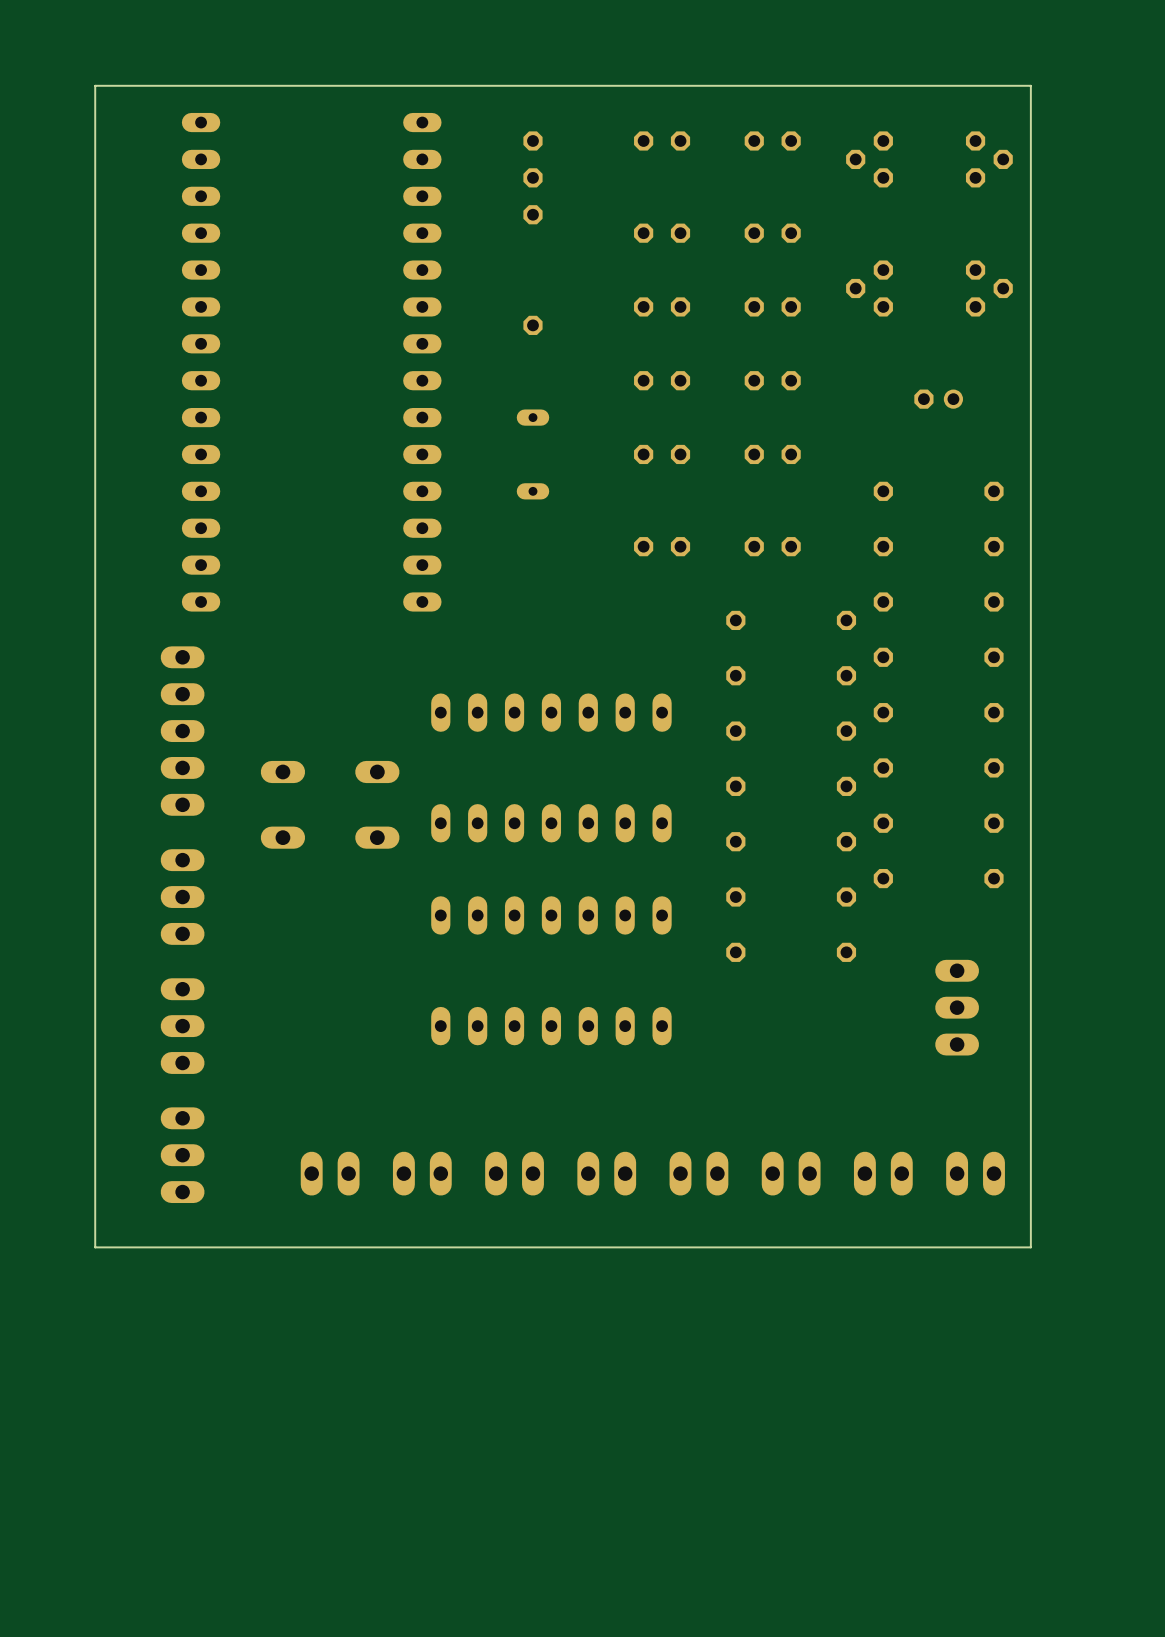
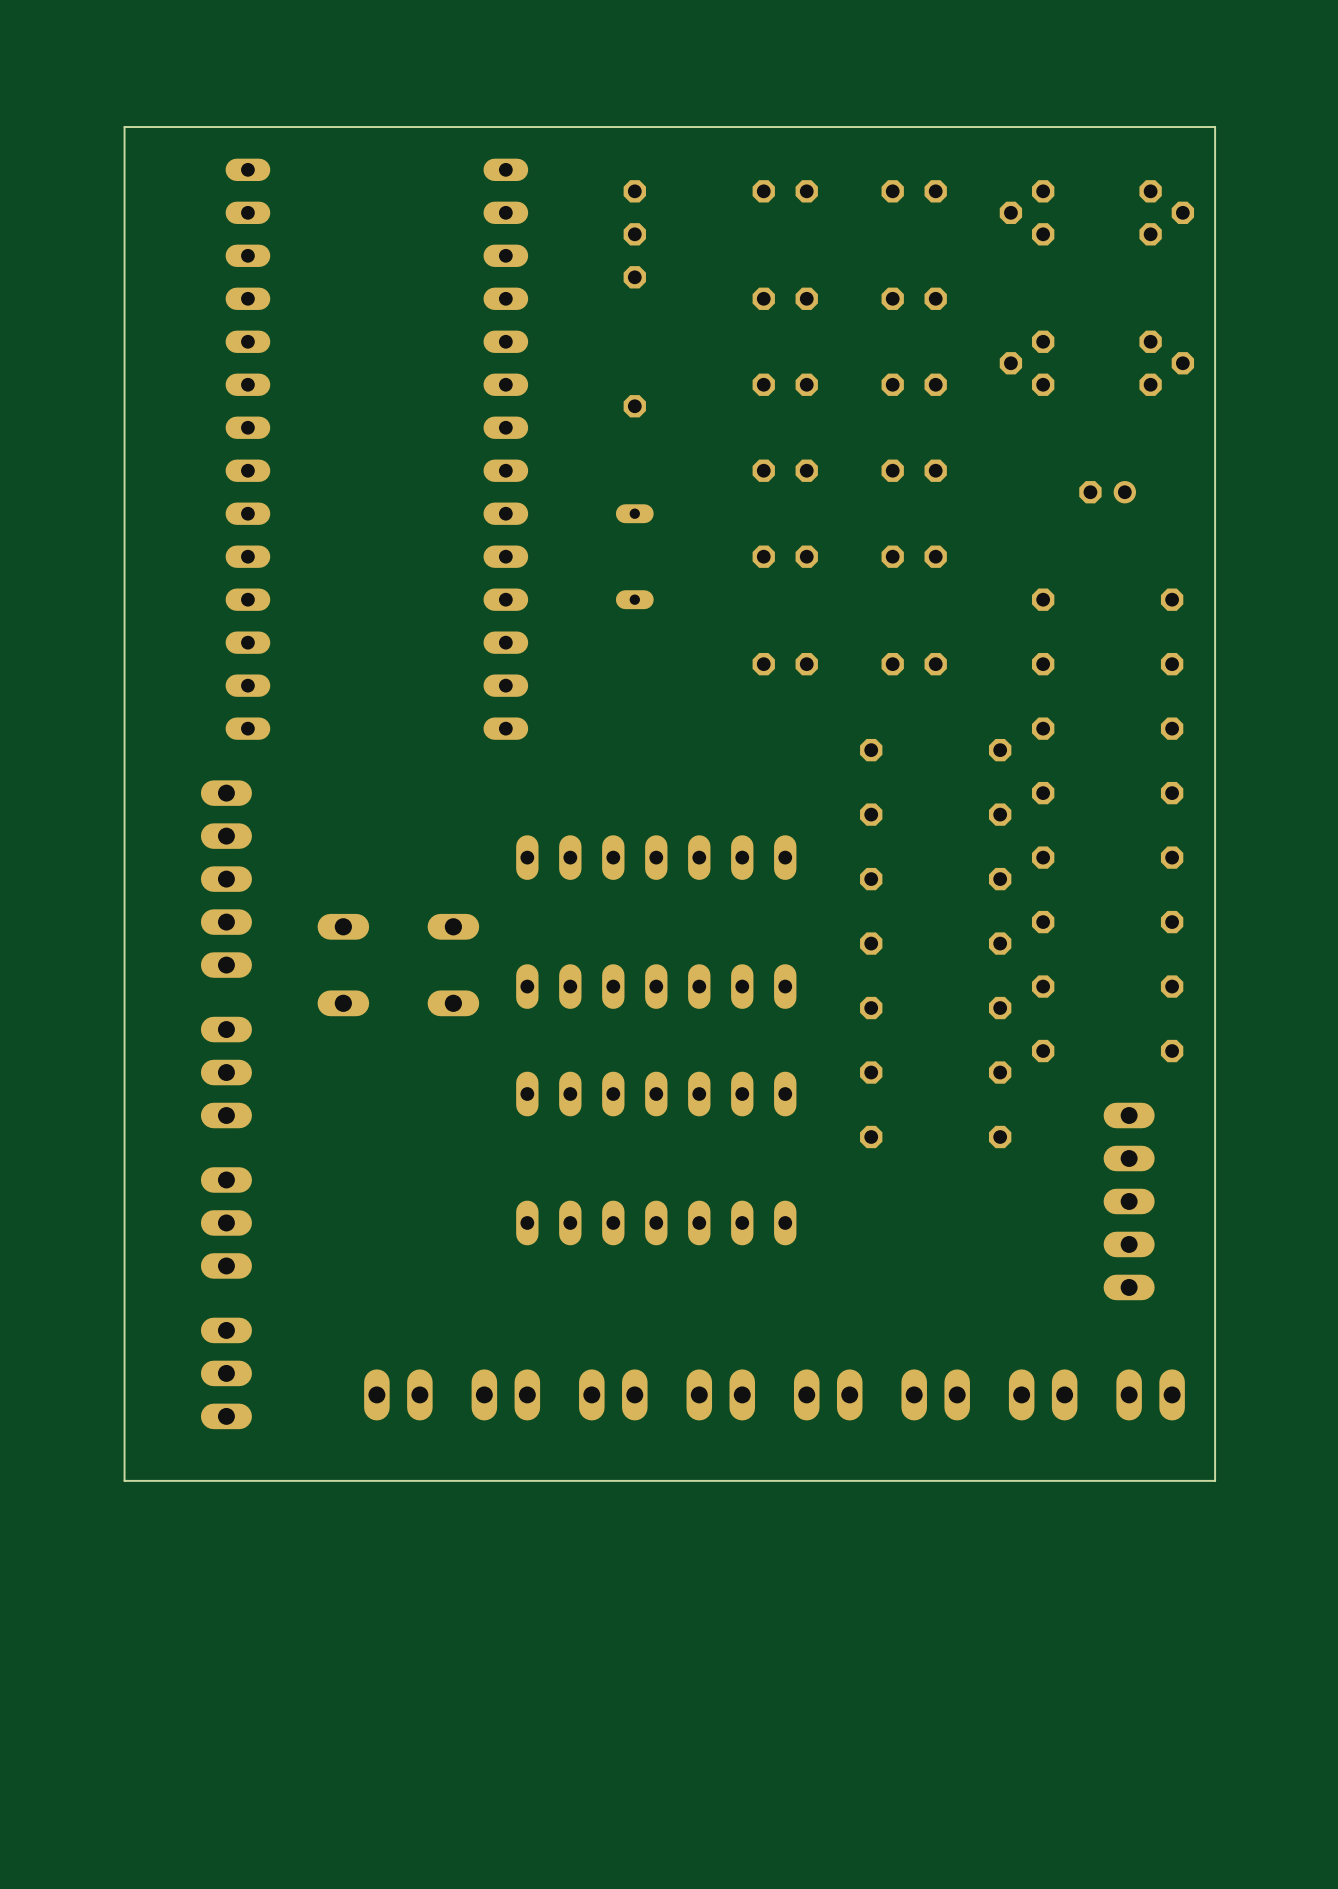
part footprint: [935, 959, 980, 1056] -> [1103, 1102, 1155, 1301]

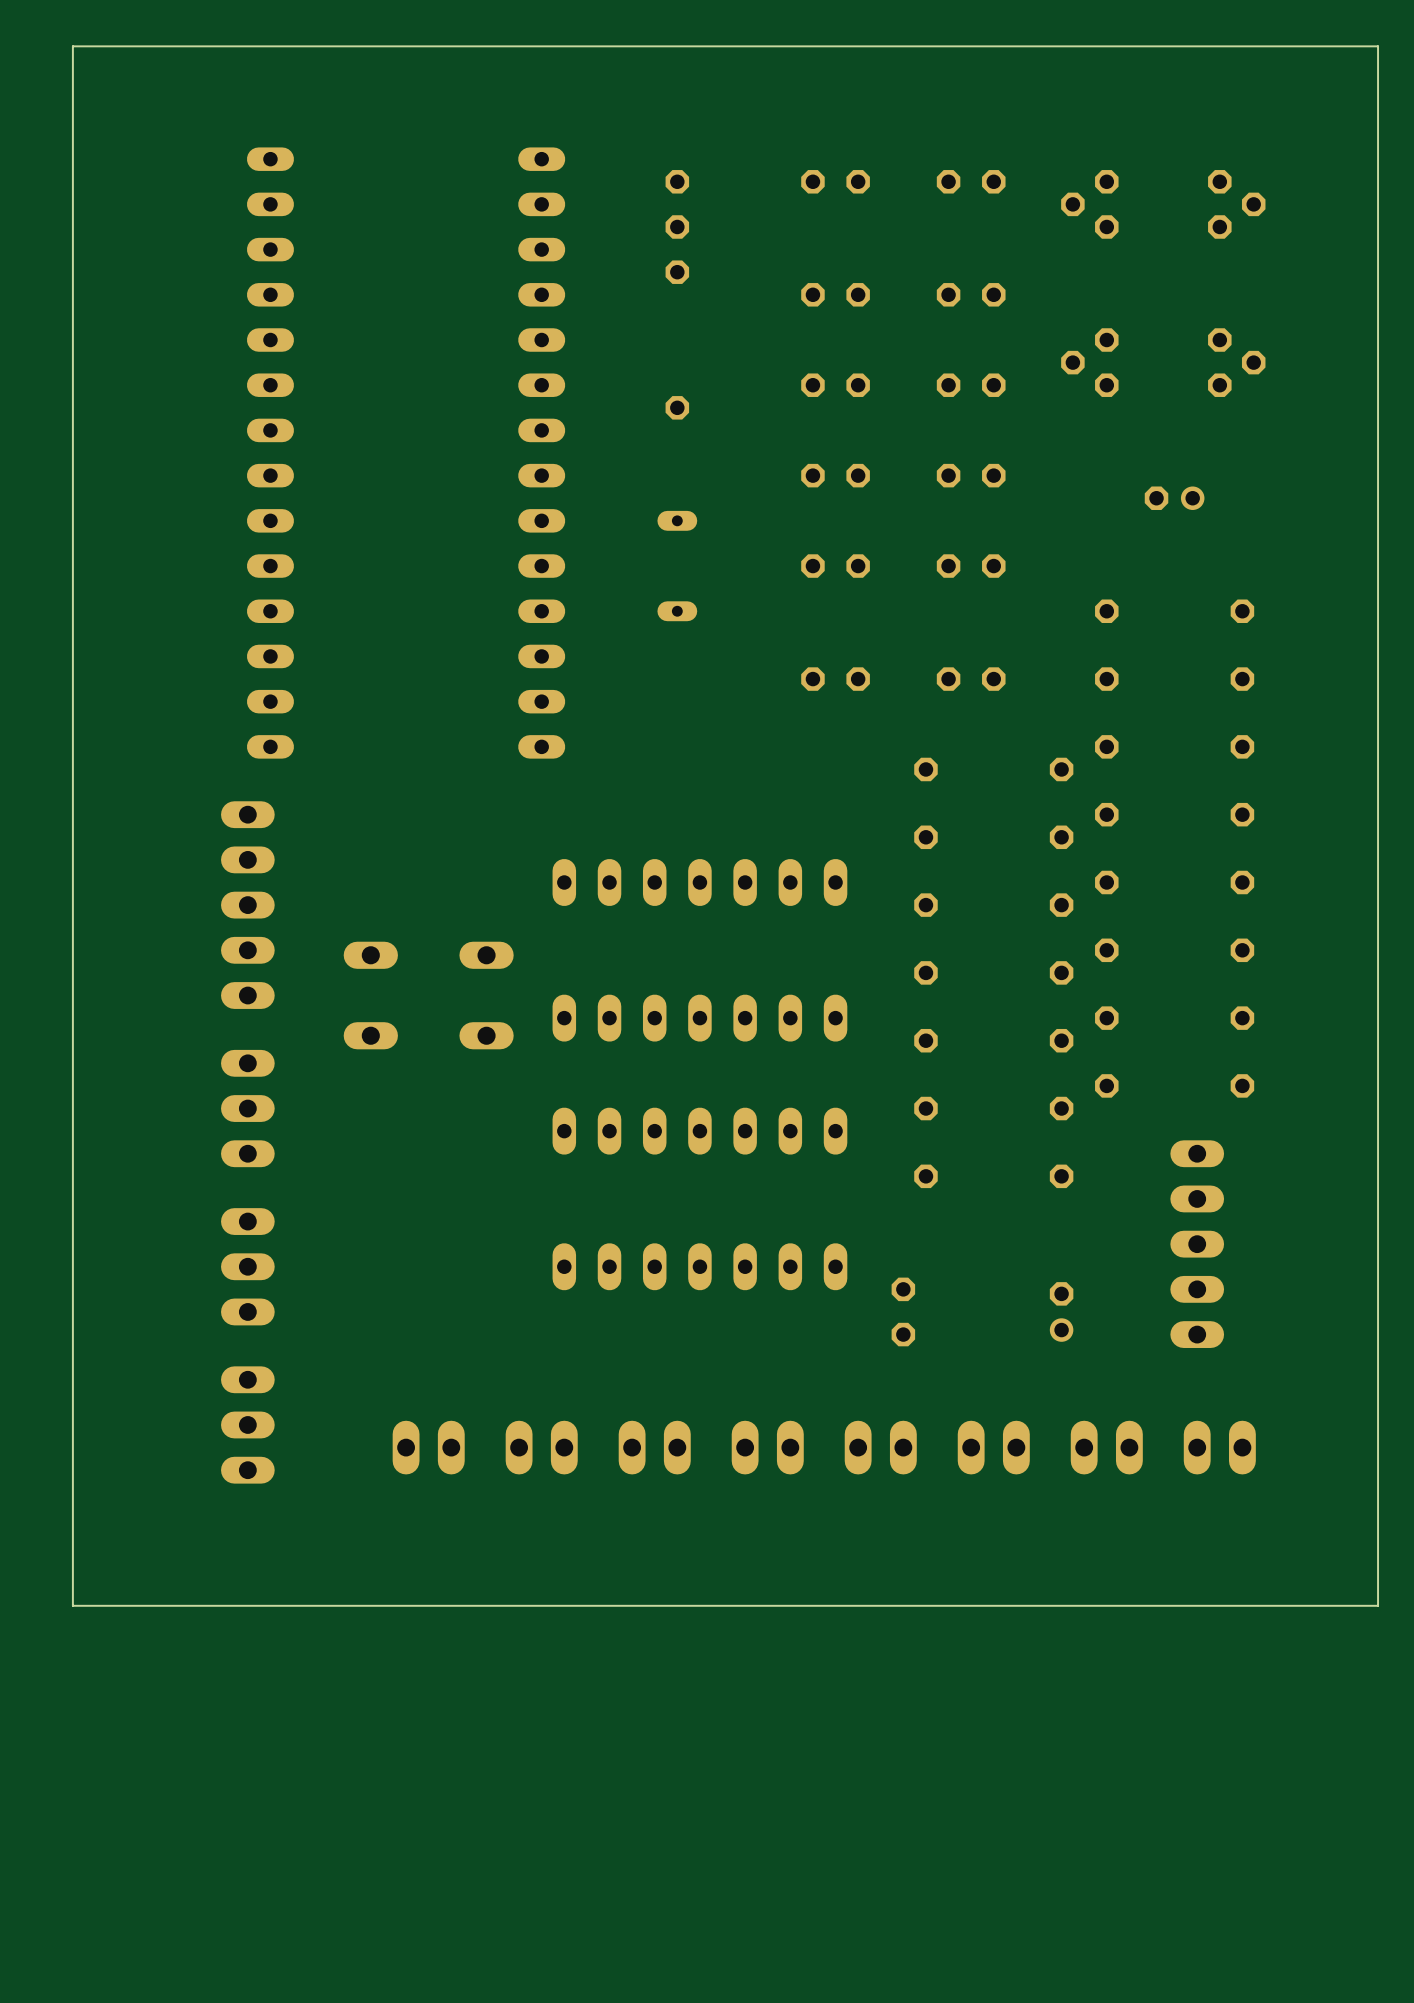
board edge: (1215, 127) (124, 127) (124, 1480) (1215, 1480) (1215, 127) -> (1378, 46) (1378, 1605) (72, 1605) (72, 46) (1378, 46)
part: none -> (903, 1311)
part: none -> (1061, 1311)

